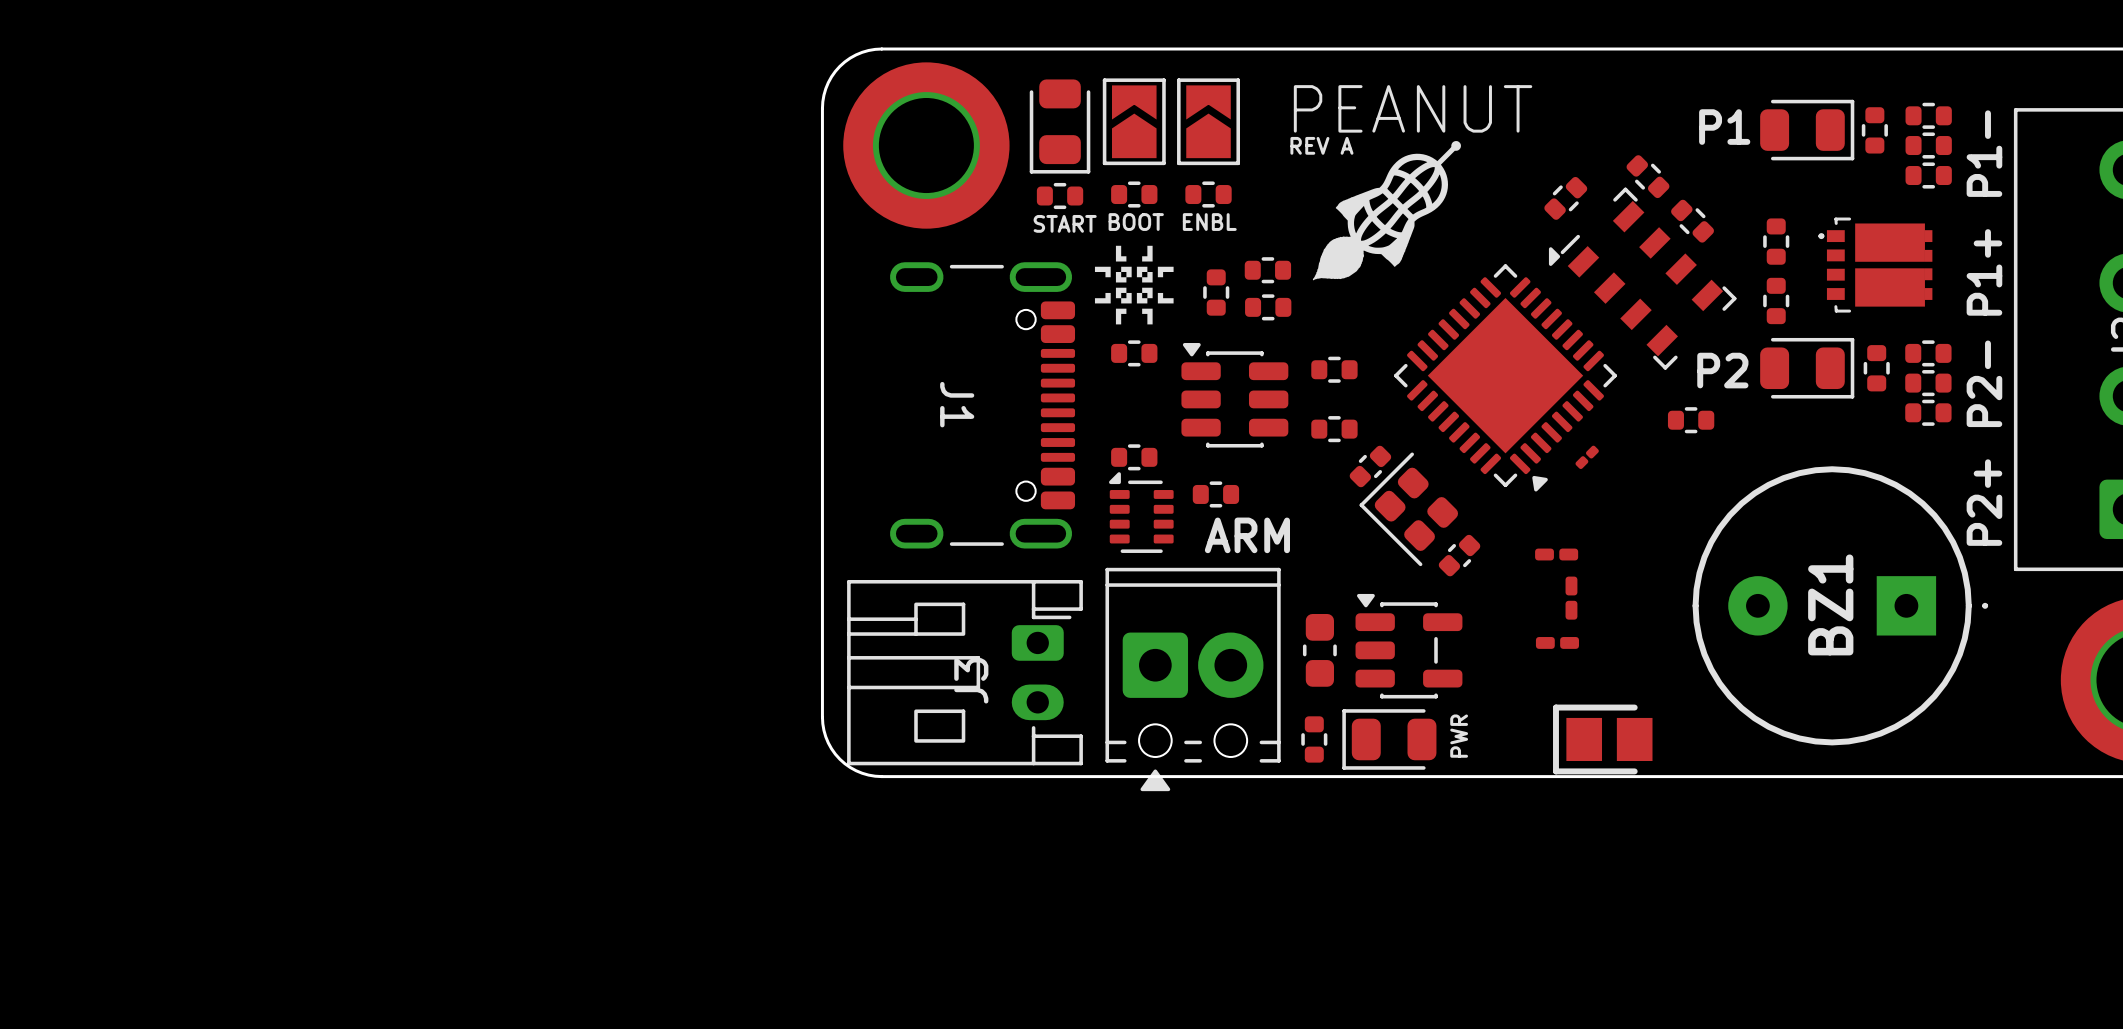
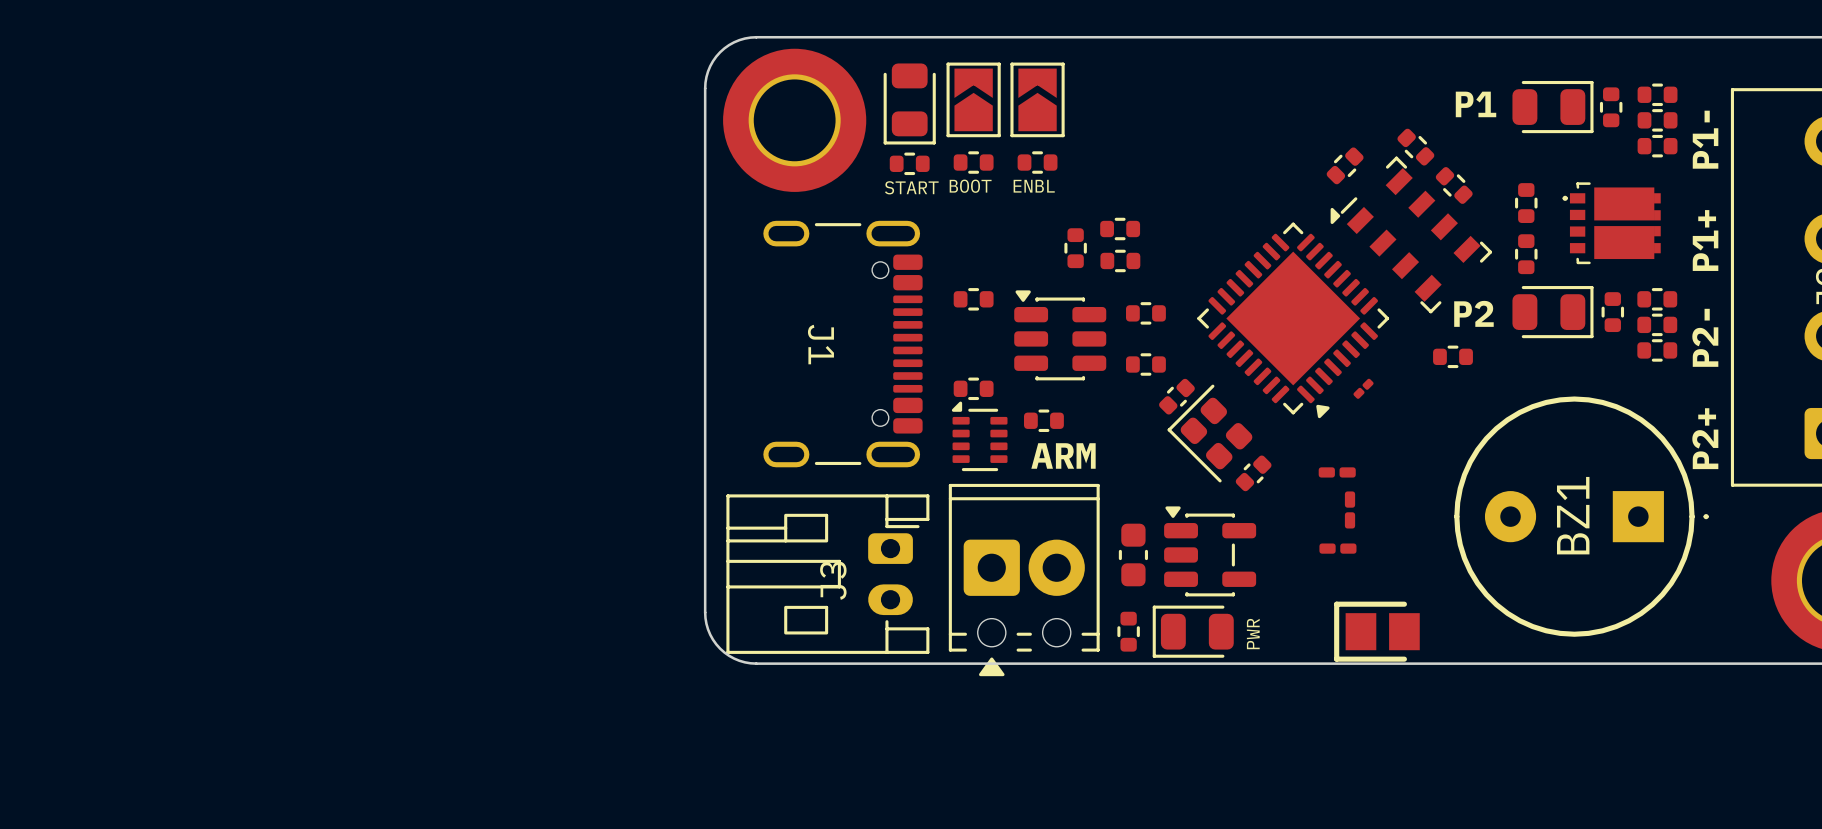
text: PEANUT (1413, 108) -> none
drawing: [1312, 141, 1461, 281] -> none
text: REV A (1321, 145) -> none
drawing: [1094, 245, 1174, 325] -> none
part: (1267, 270) -> none
part: none -> (1120, 229)
part: (1216, 292) -> none
part: none -> (1075, 248)
part: (1268, 307) -> none
part: none -> (1120, 260)

